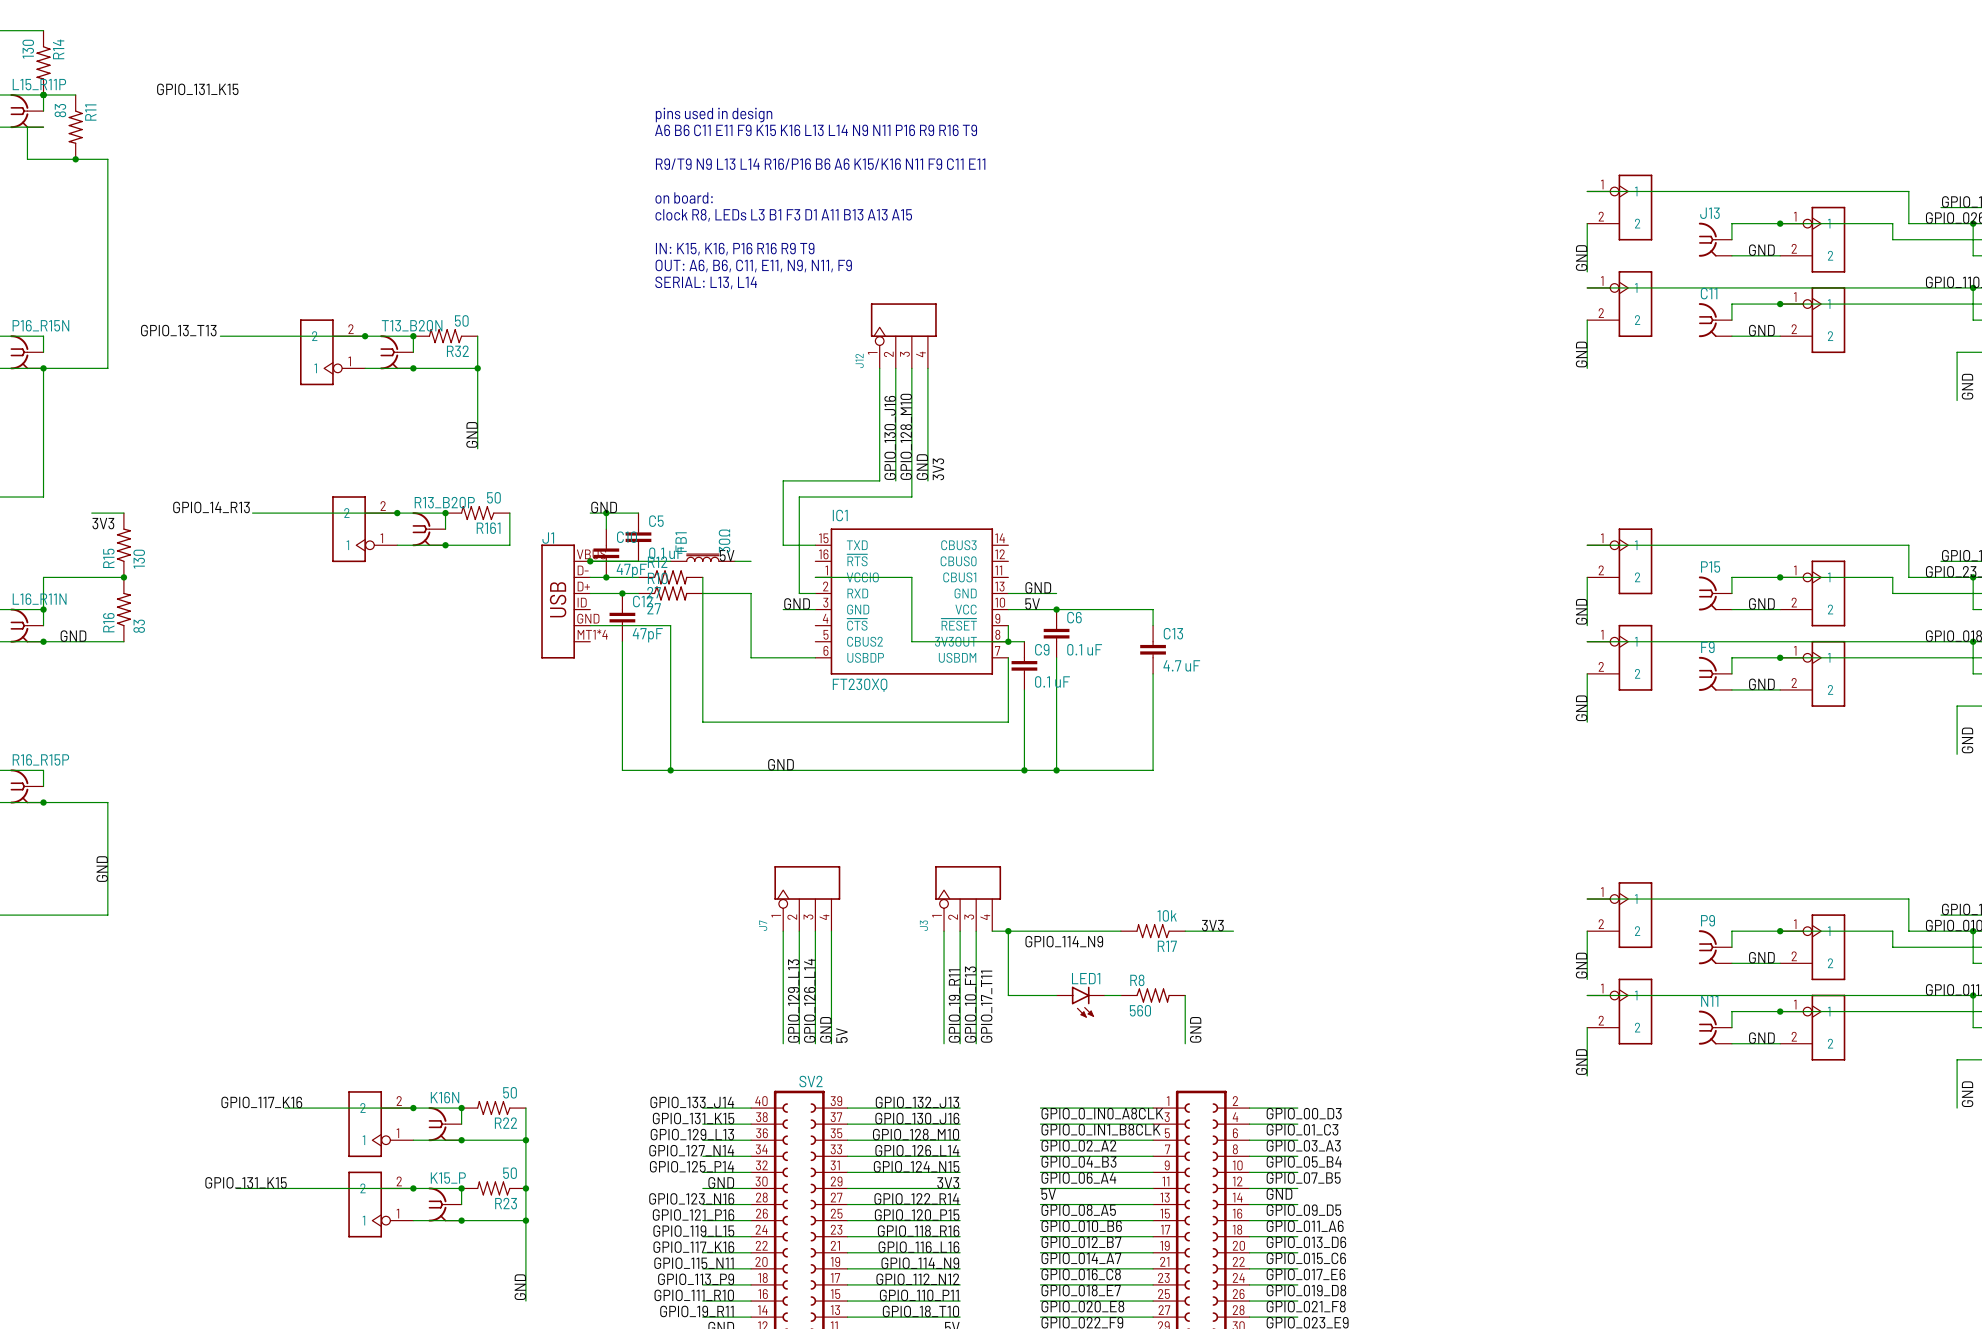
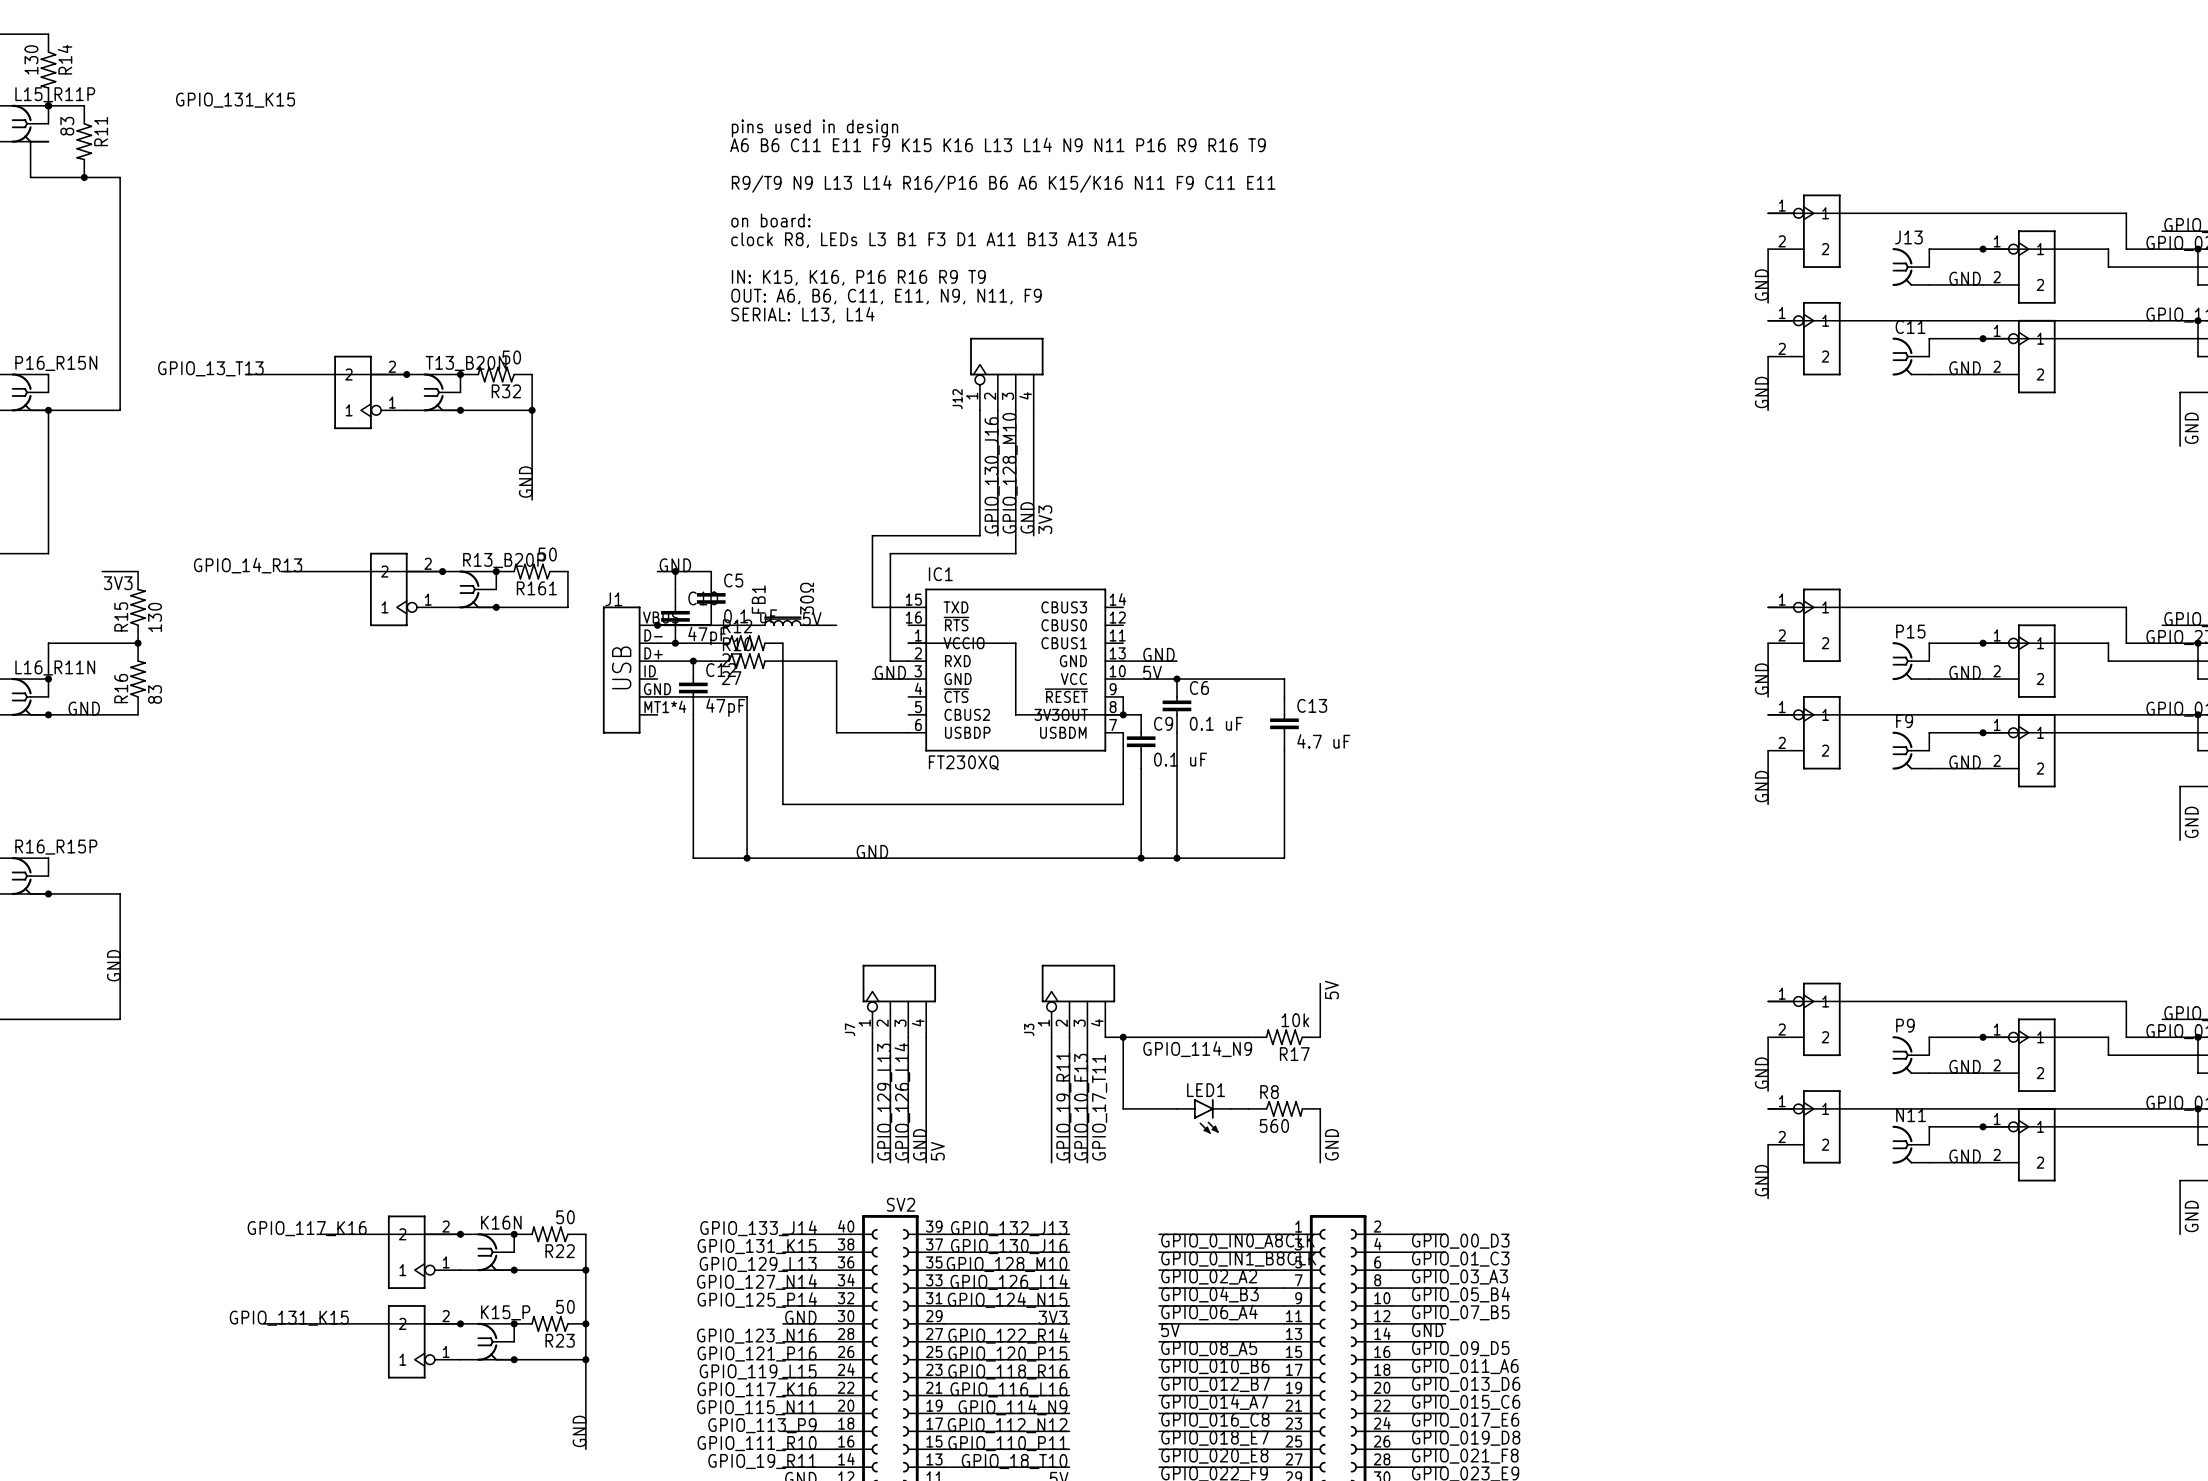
label: none -> 5V (1331, 990)
label: 3V3 (1212, 925) -> none
wire: (1185, 931) (1233, 931) -> (1320, 1037) (1320, 983)

